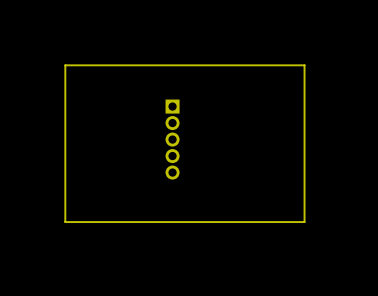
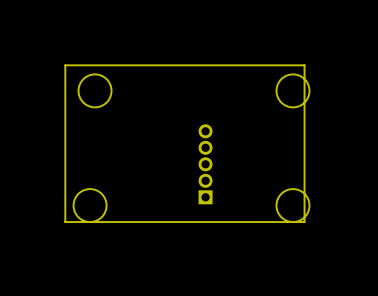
round board edge: none -> [78, 73, 112, 108]
round board edge: none -> [276, 73, 310, 108]
part rotation: 0° (172, 139) -> 180° (205, 164)
round board edge: none -> [73, 188, 107, 223]
round board edge: none -> [276, 188, 310, 223]

